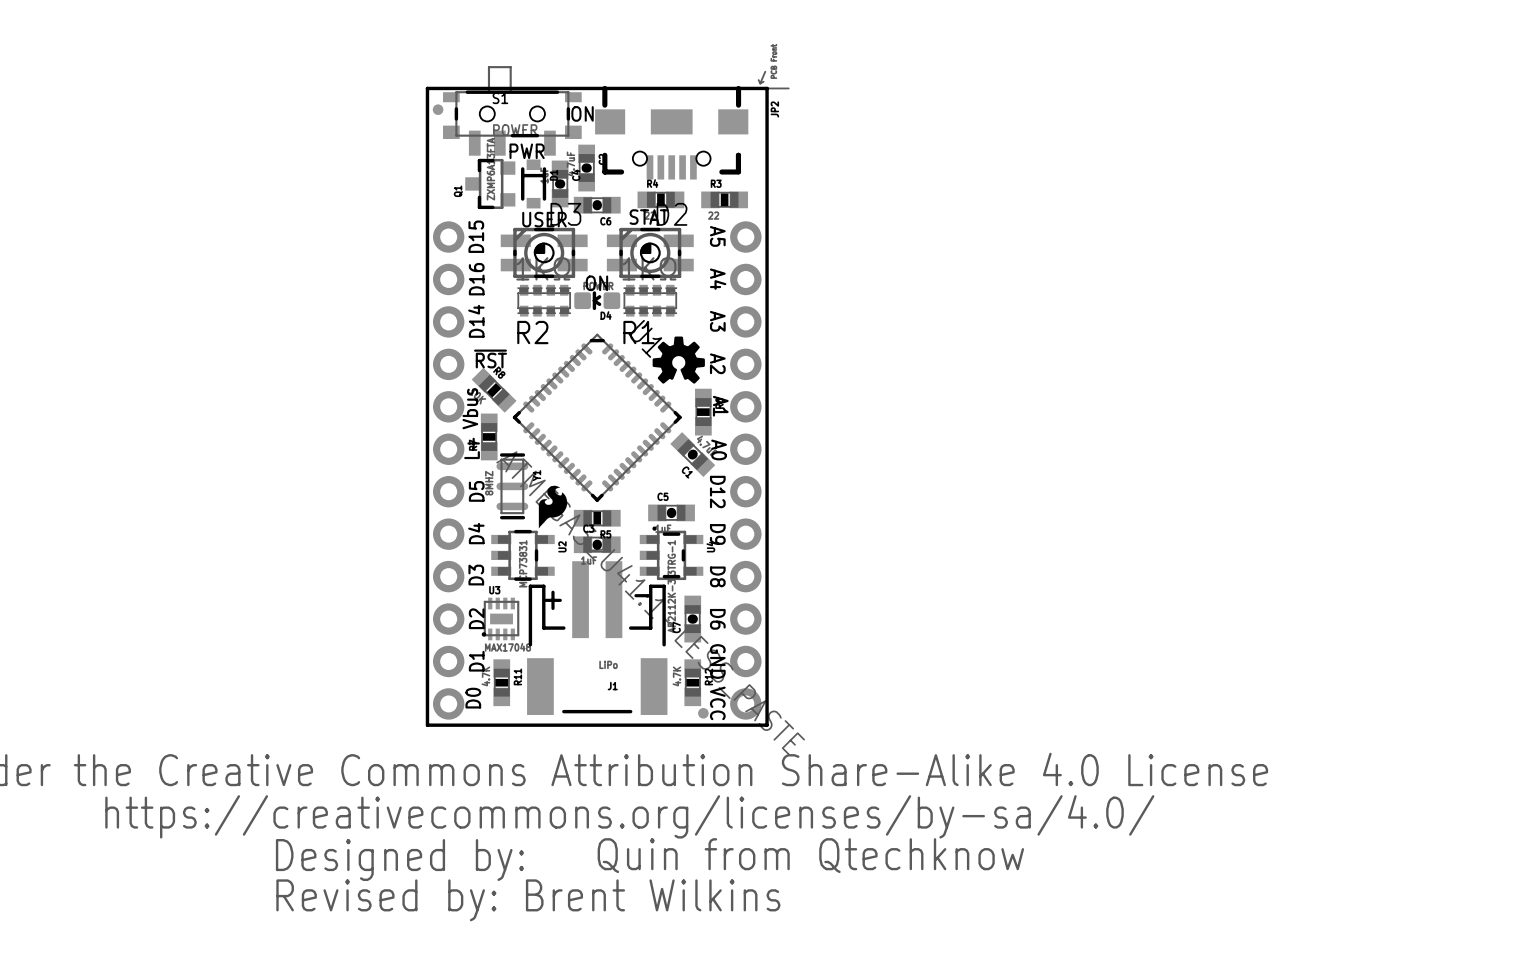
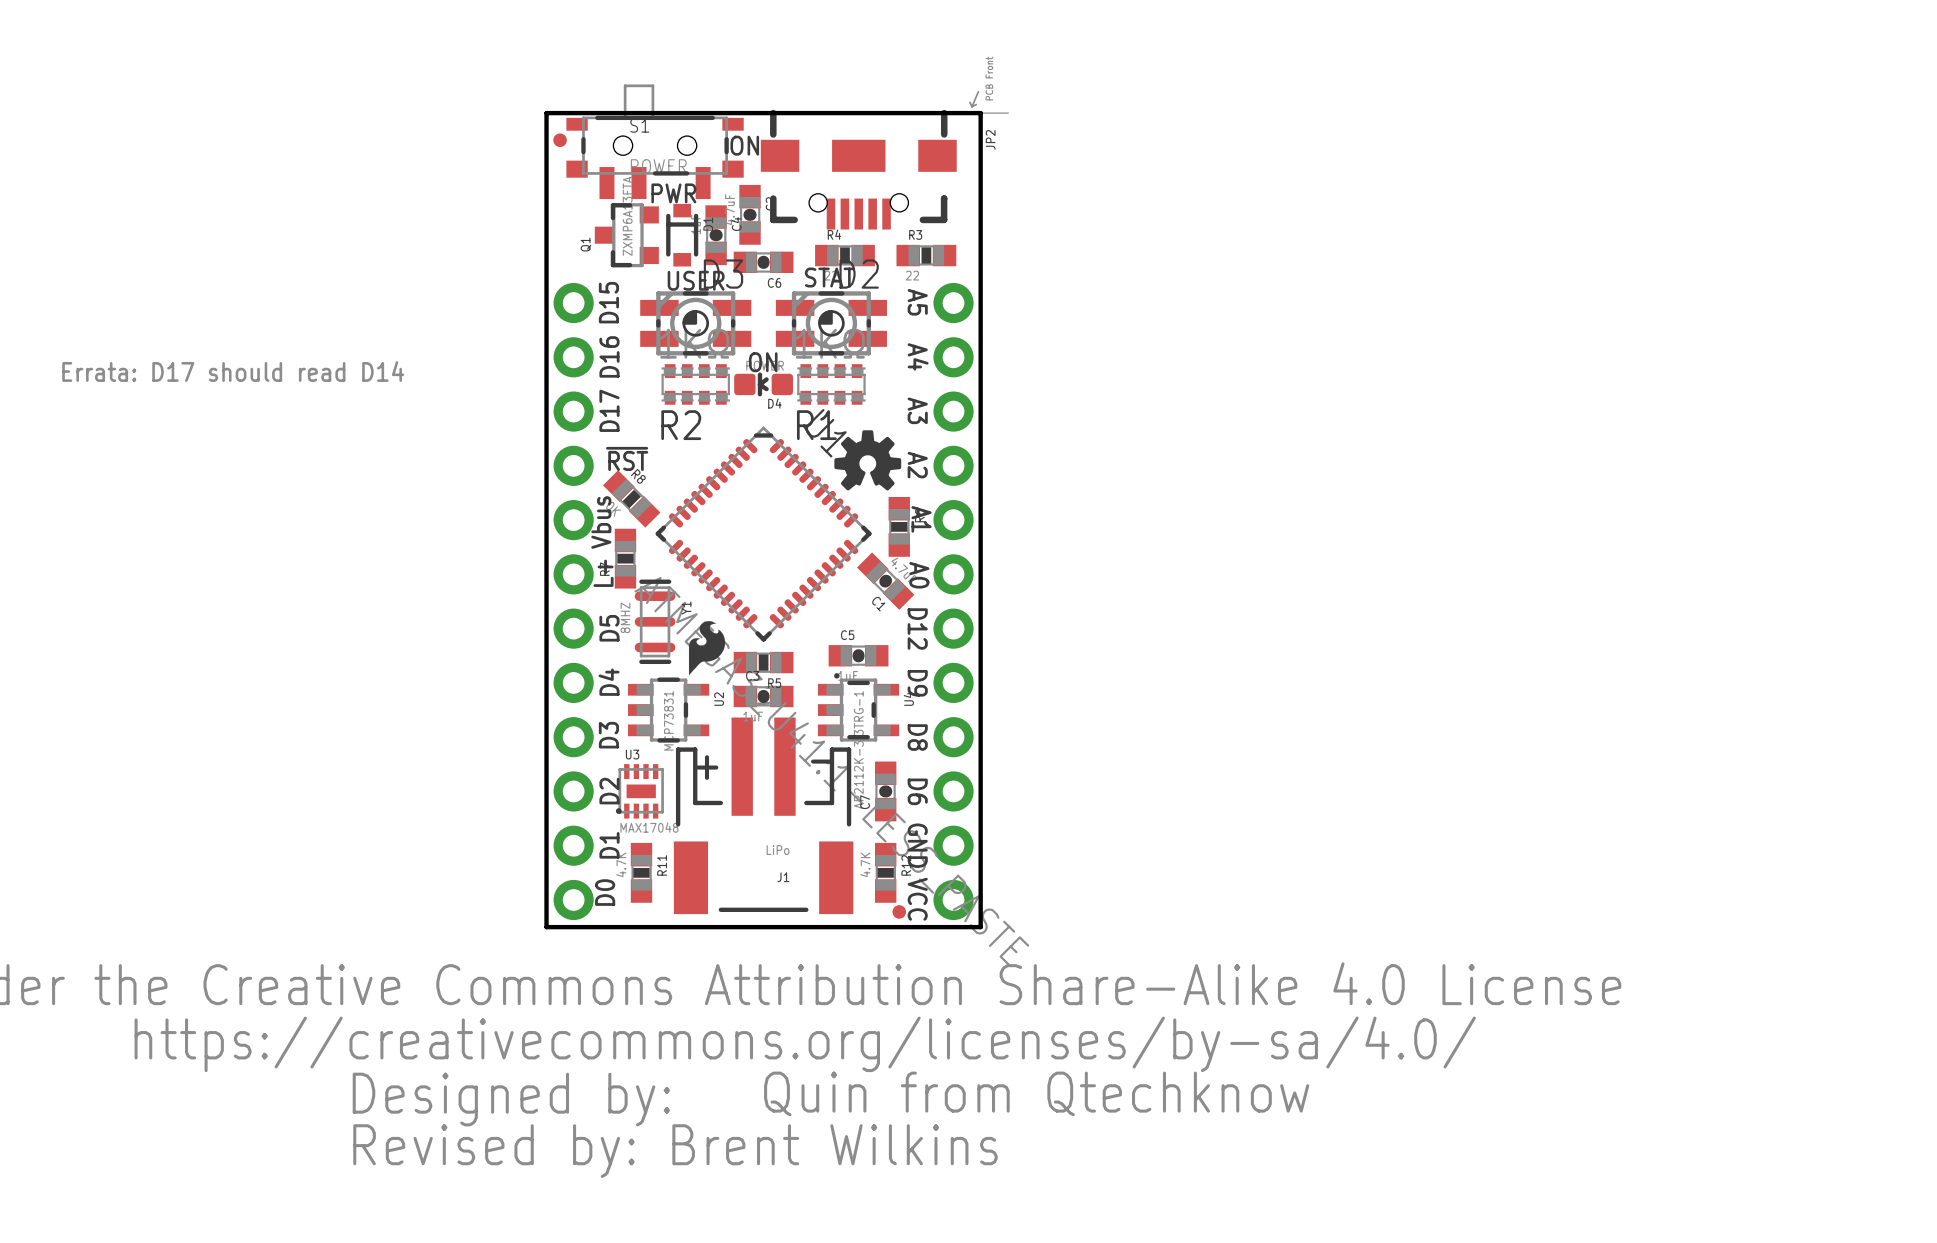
text: none -> Errata: D17 should read D14 (233, 371)
text: D14 (476, 321) -> D17 (609, 410)

